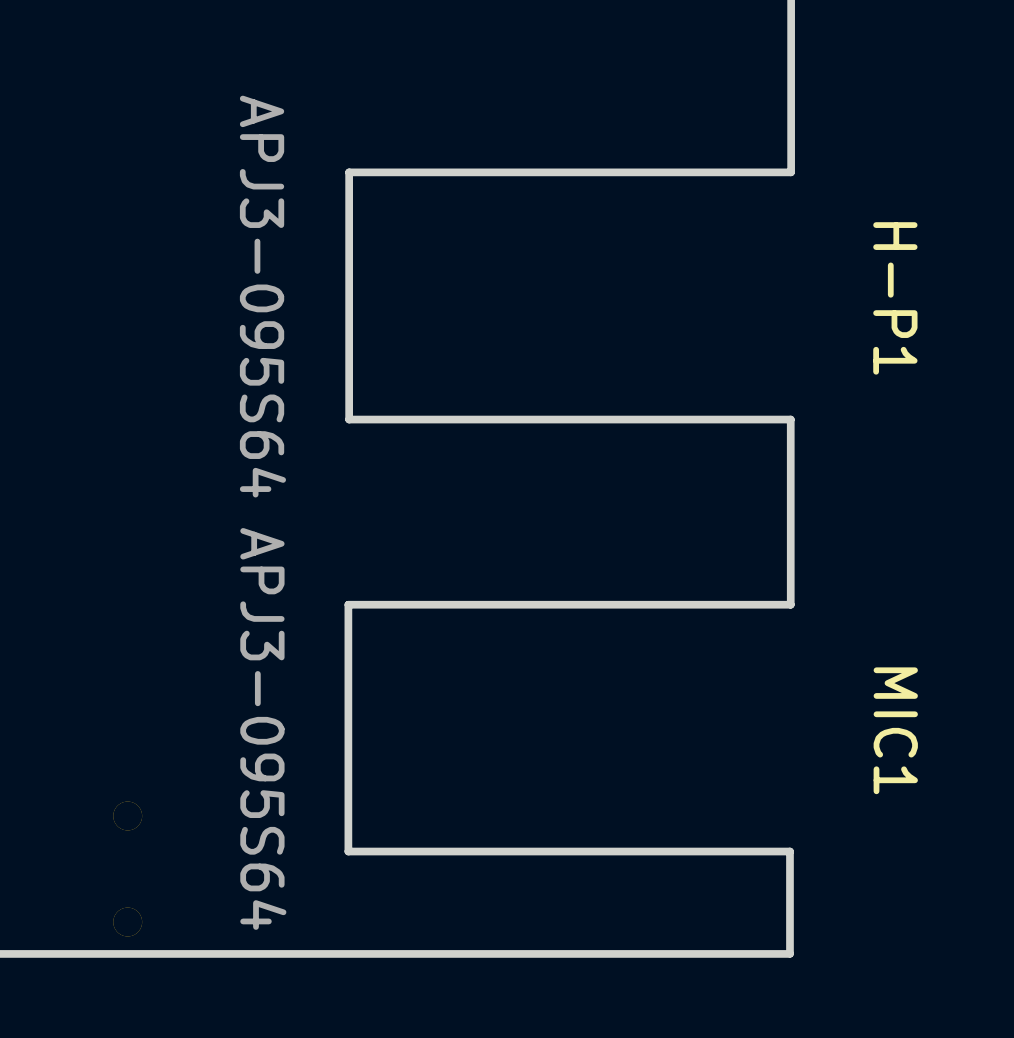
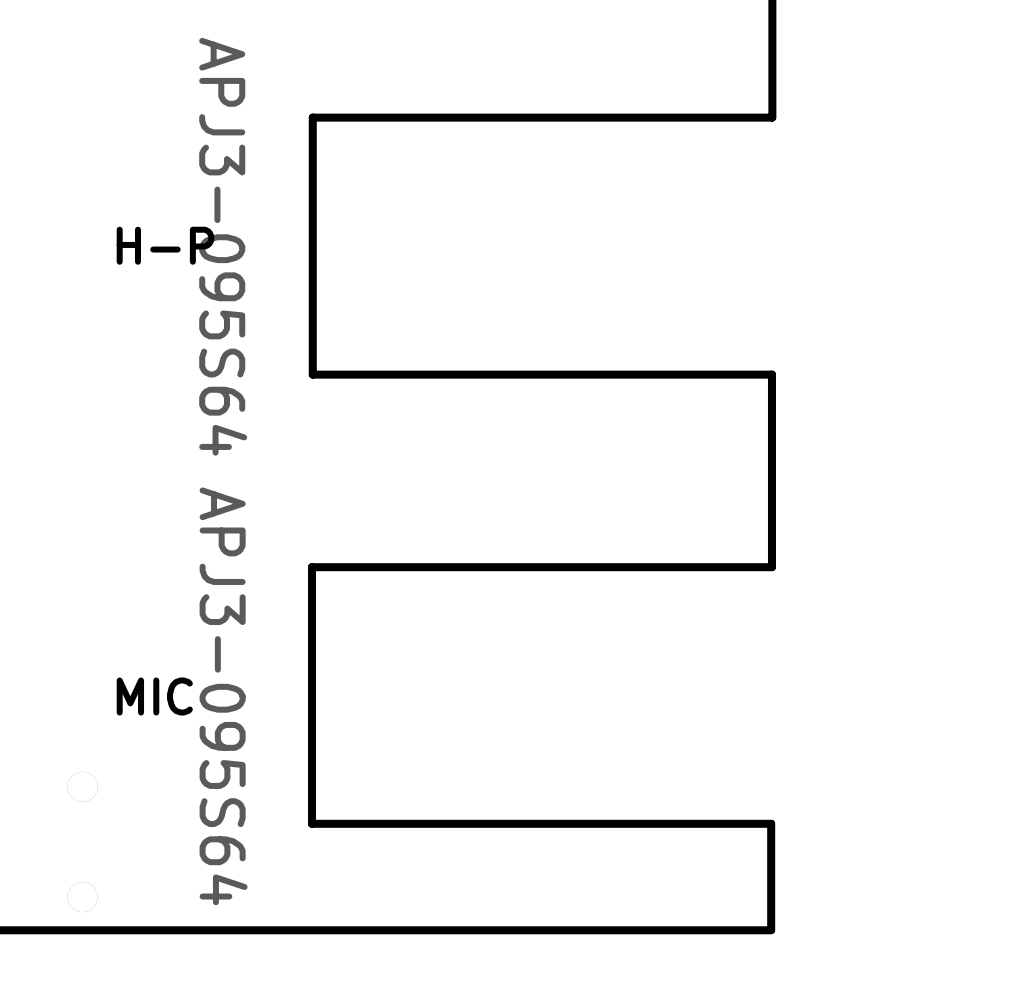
H-P: none -> APJ3-095S64 (181, 246)
H-P1: APJ3-095S64 (578, 296) -> none
MIC: none -> APJ3-095S64 (182, 696)
MIC1: APJ3-095S64 (579, 728) -> none

